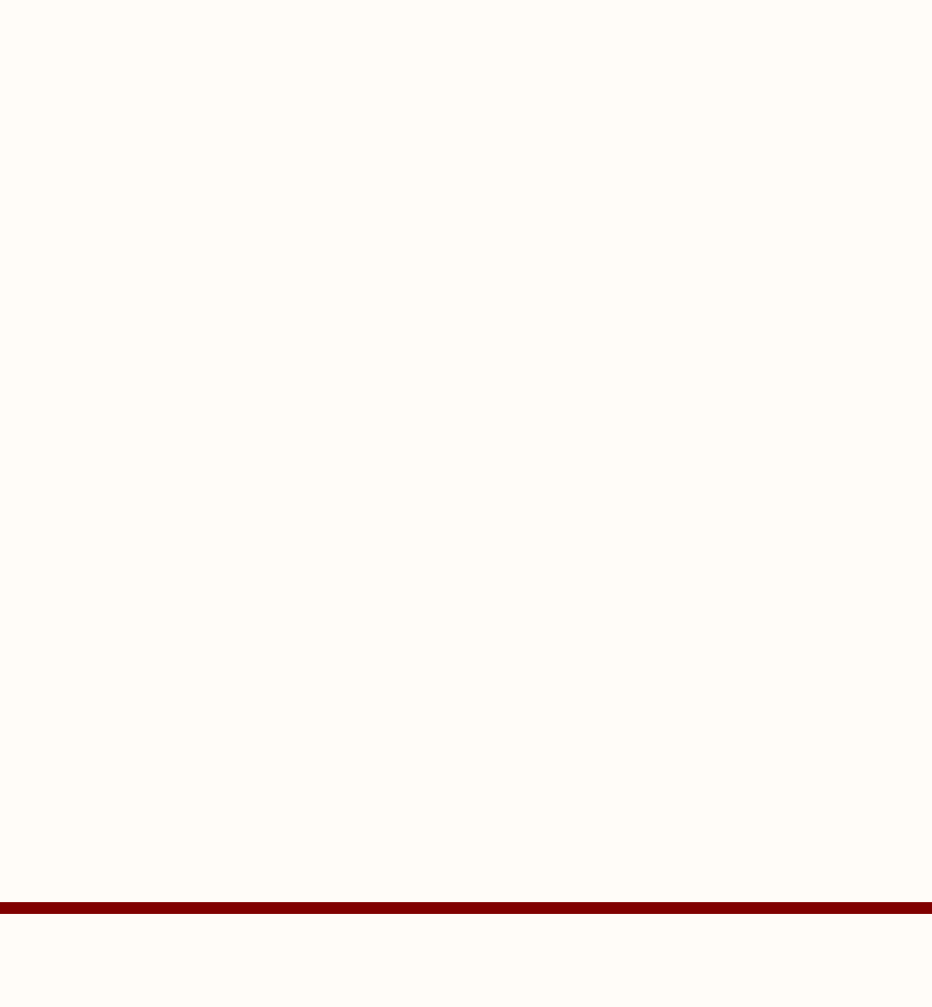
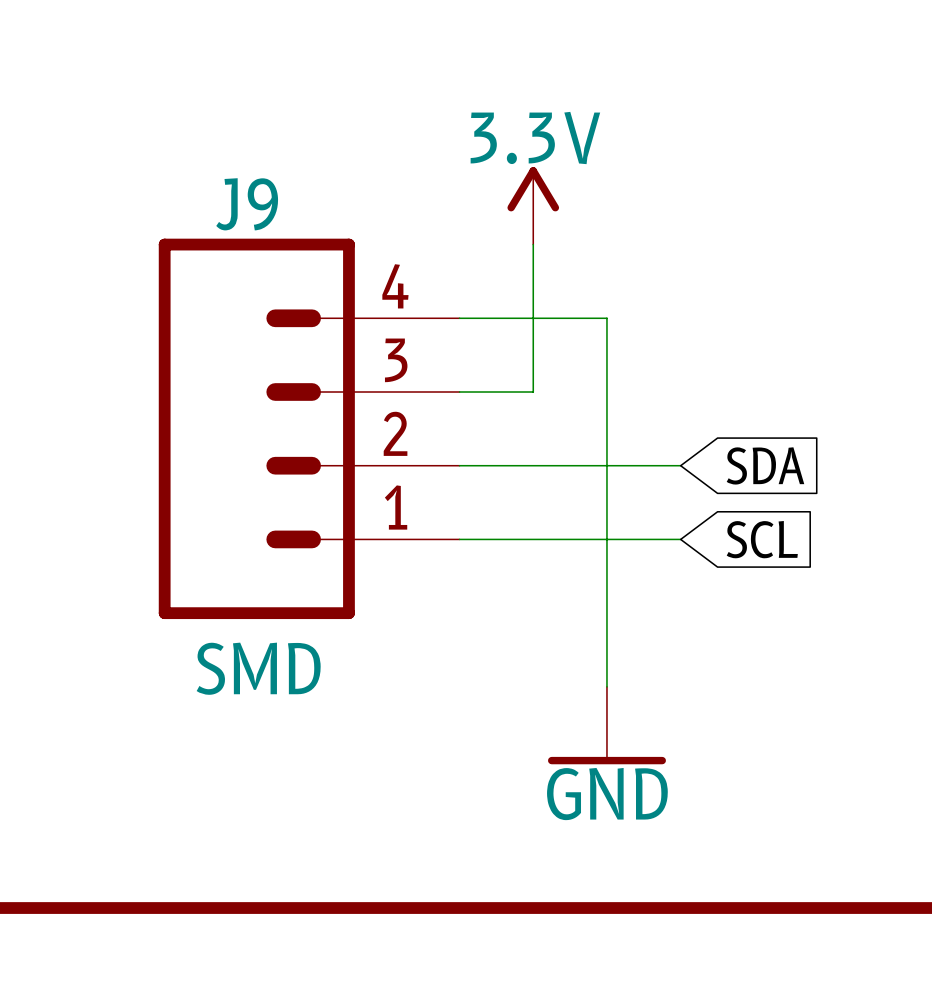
power symbol: none -> 3.3V (533, 205)
wire: none -> (533, 244) (533, 392) (459, 392)
wire: none -> (459, 318) (606, 318) (606, 686)
J9: none -> SMD (309, 428)
wire: none -> (459, 465) (680, 465)
global label: none -> SDA (765, 465)
wire: none -> (459, 539) (680, 539)
global label: none -> SCL (762, 539)
power symbol: none -> GND (606, 725)

